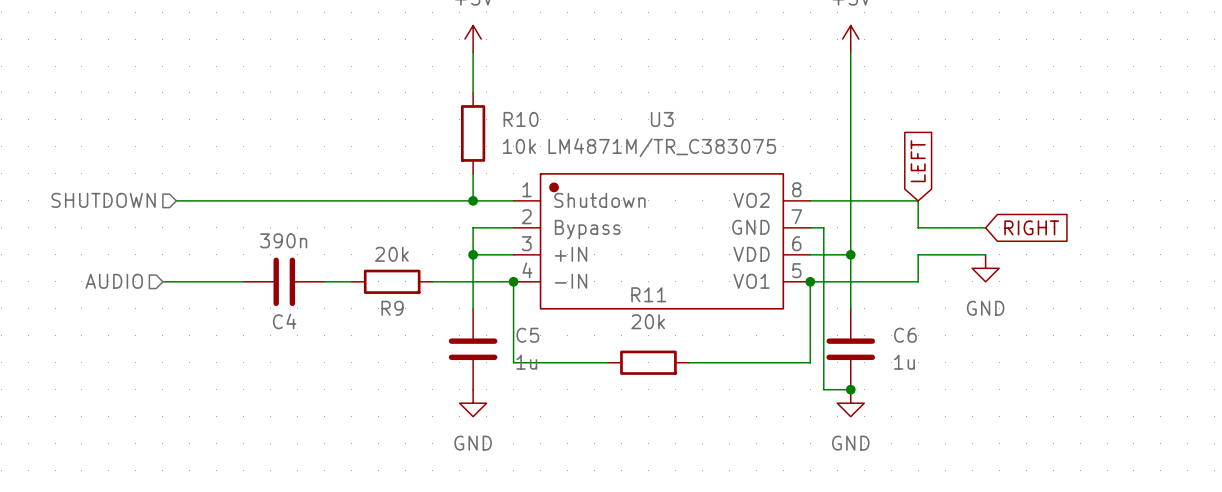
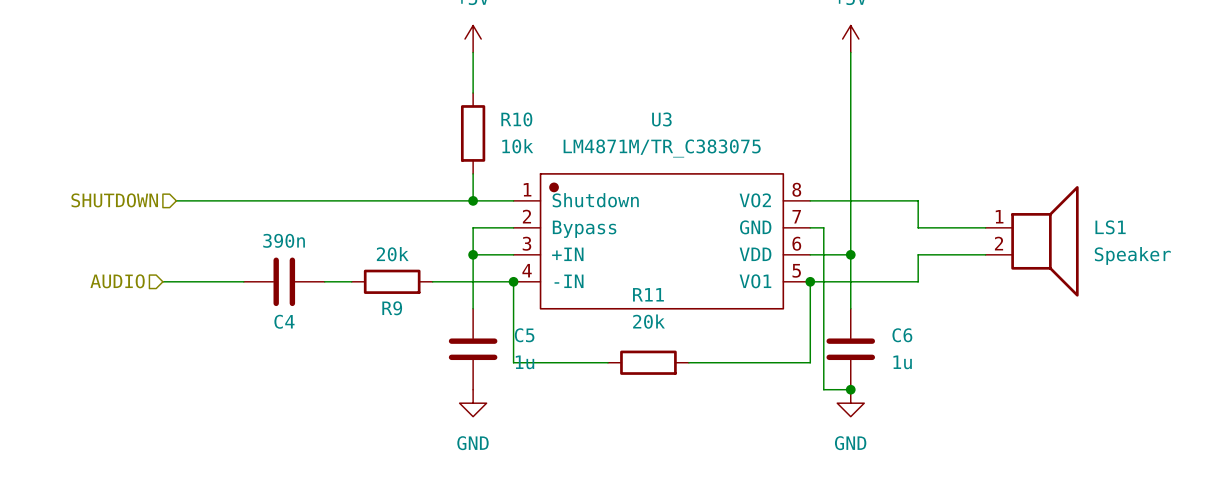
global label: LEFT (918, 161) -> none
global label: RIGHT (1031, 227) -> none
LS1: none -> Speaker (1032, 241)
power symbol: GND (985, 268) -> none

